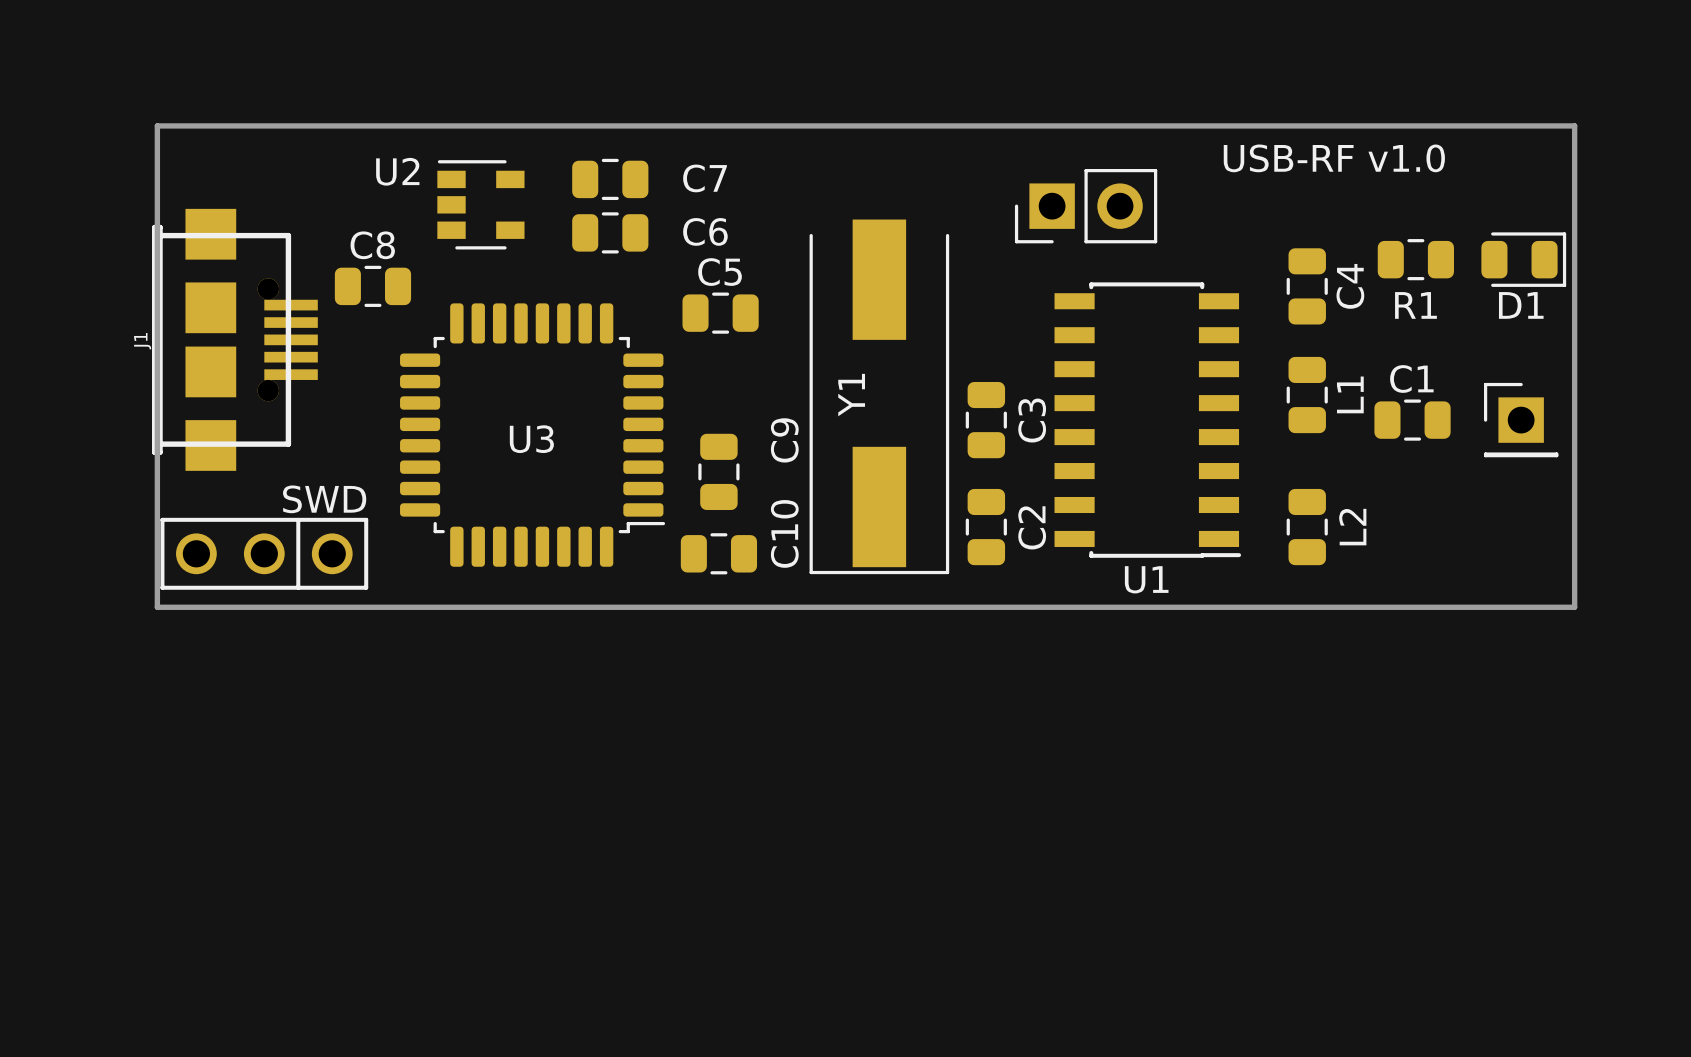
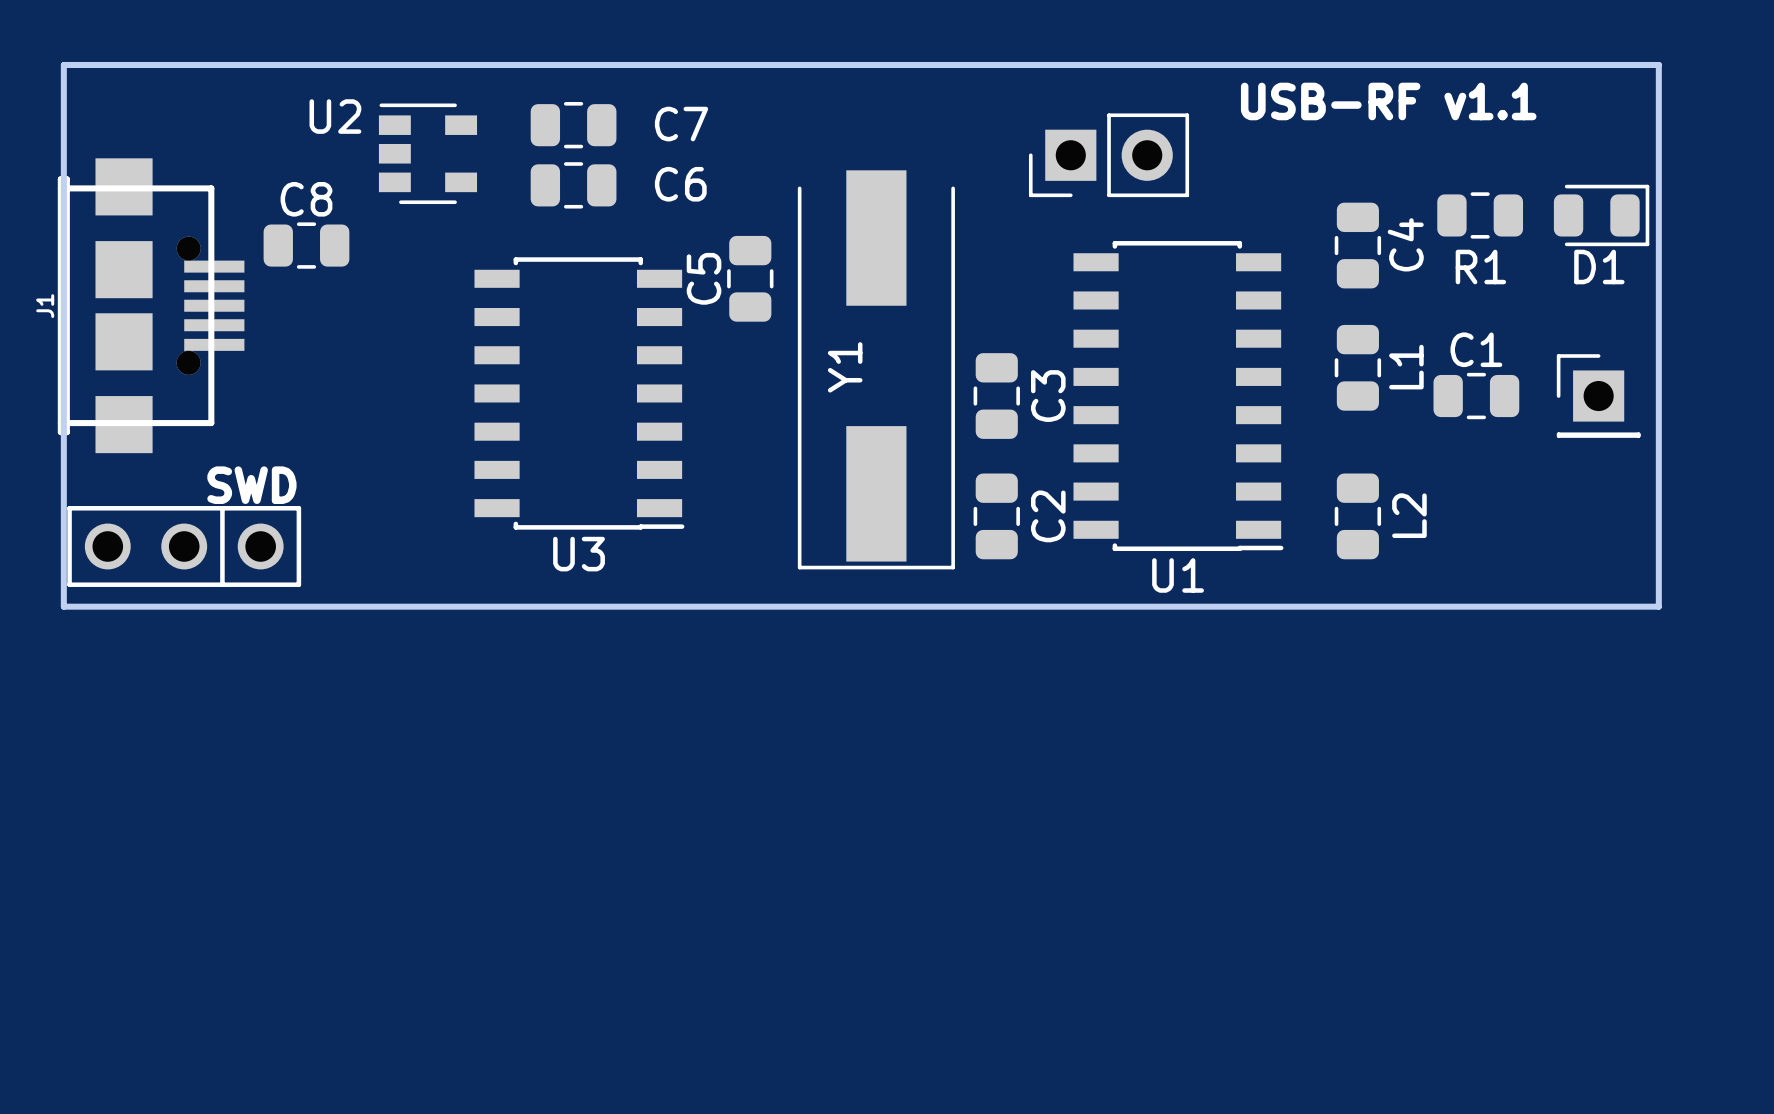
text: USB-RF v1.0 (1334, 158) -> USB-RF v1.1 (1388, 101)
C5 name position: C5 (720, 272) -> C5 (704, 278)
U3 footprint: [400, 303, 666, 567] -> [474, 257, 685, 530]
C5 rotation: 0° (720, 313) -> 90° clockwise (750, 278)
C5 position: (720, 313) -> (750, 278)
U3 name position: U3 (531, 439) -> U3 (579, 554)
C9: (718, 471) -> none
C10: (718, 553) -> none

